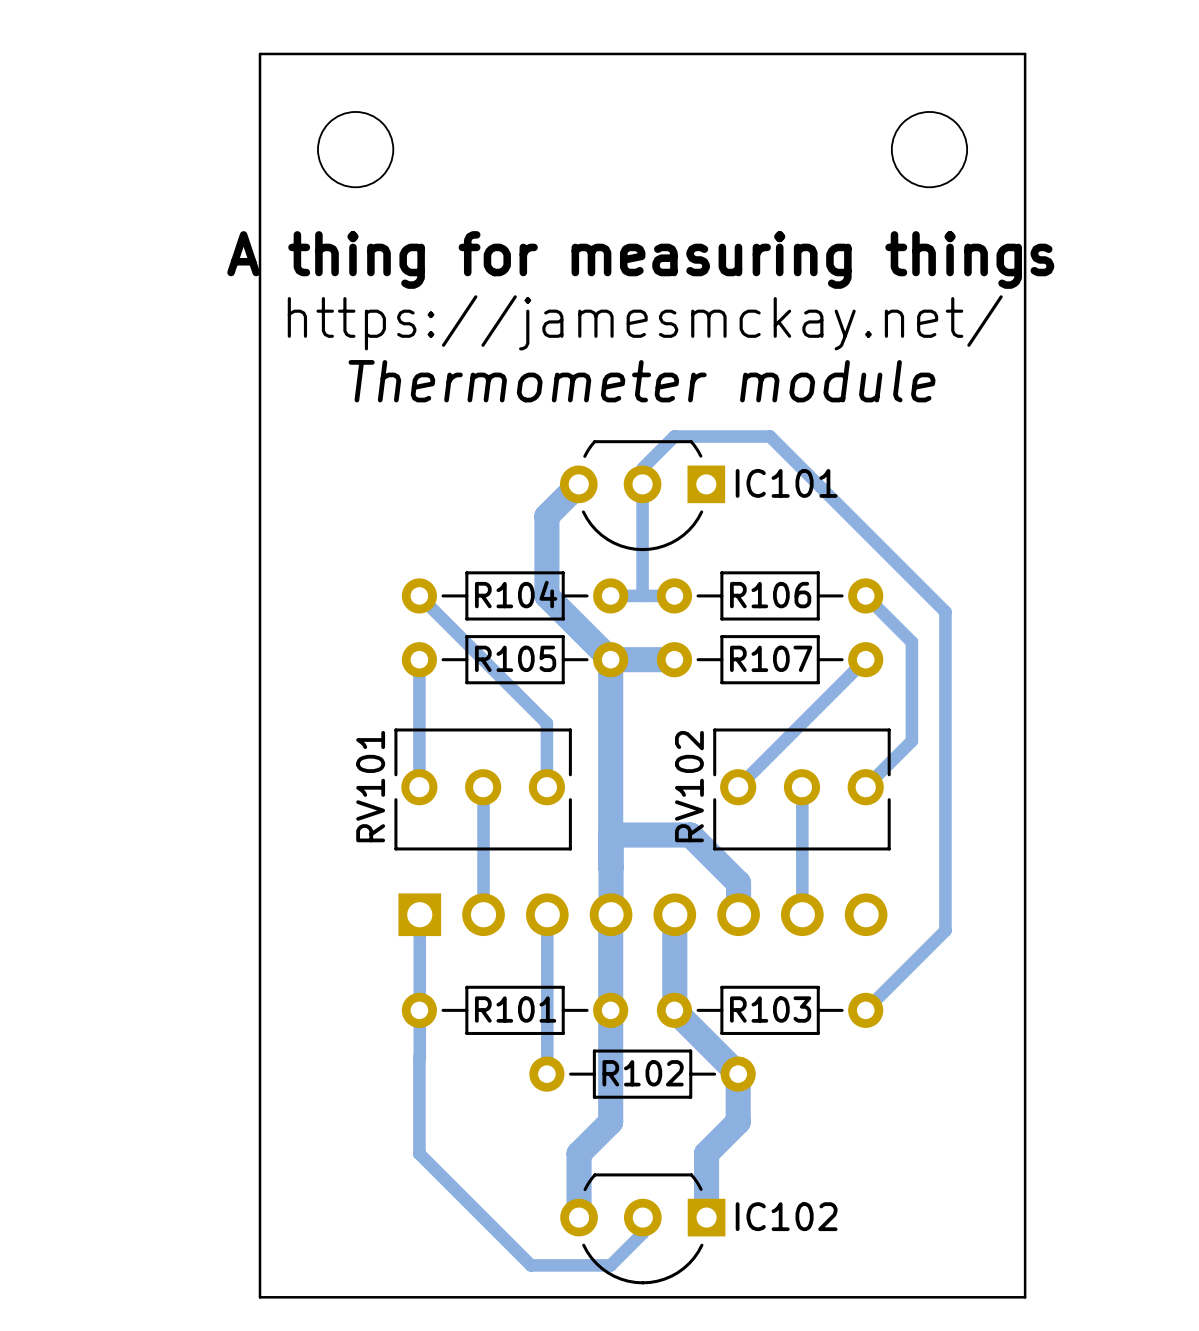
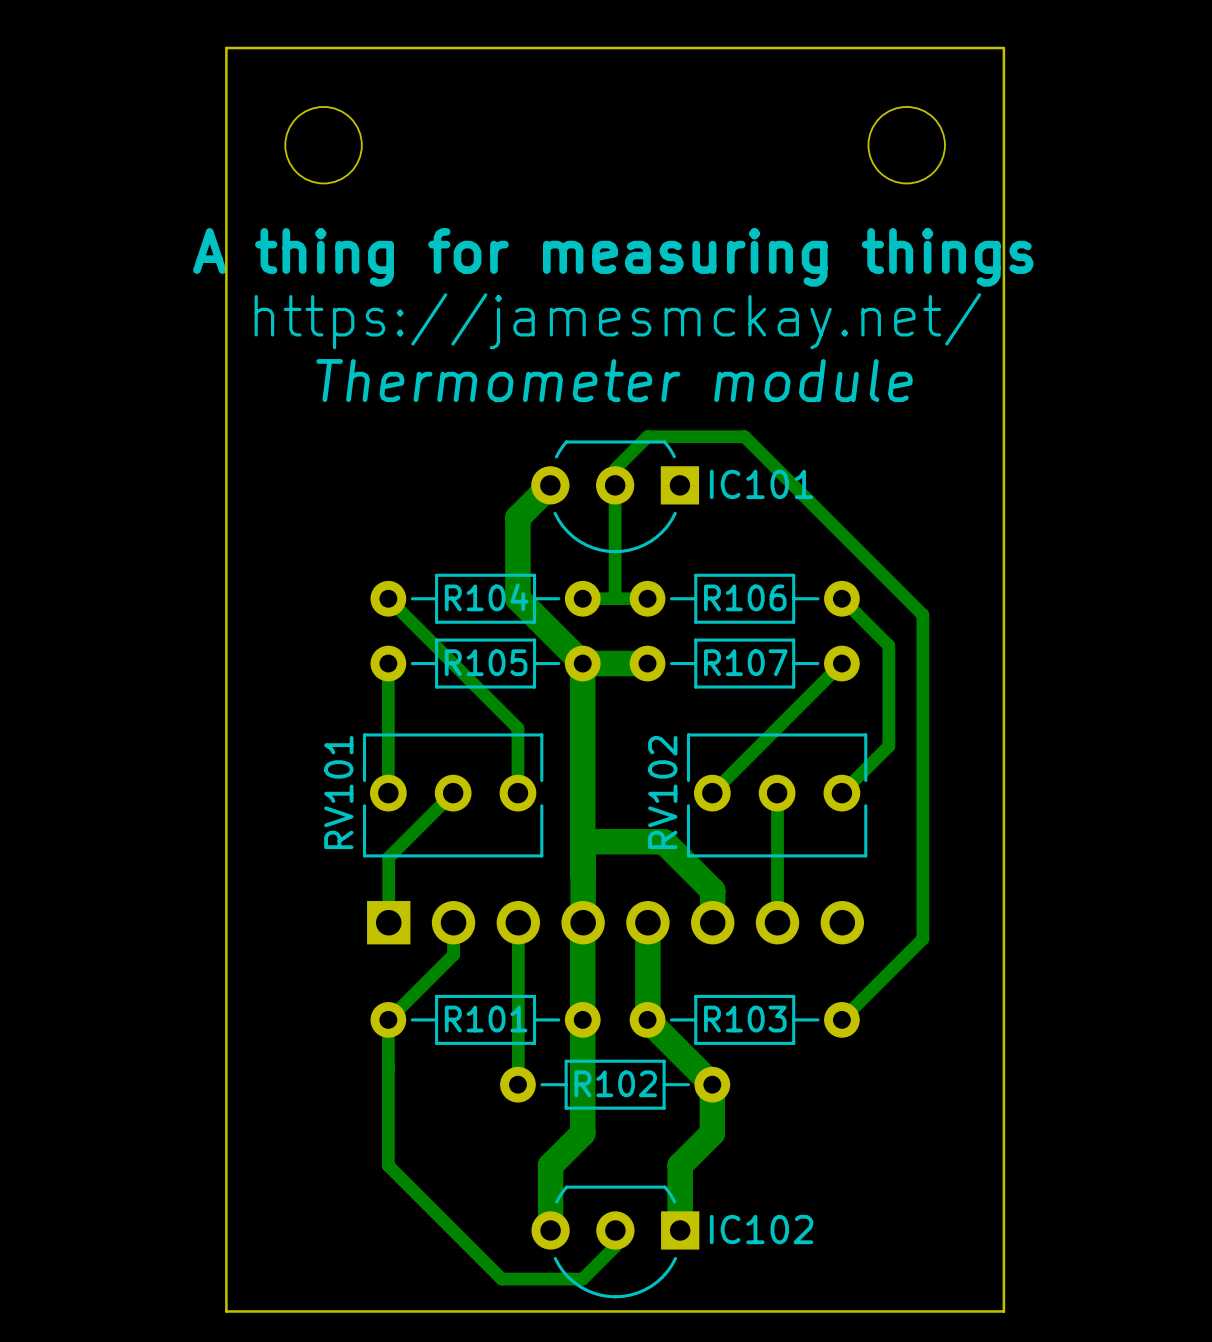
bottom track: (483, 787) (483, 914) -> (453, 793) (388, 857) (388, 922)
bottom track: (419, 914) (419, 1057) -> (453, 922) (453, 954) (388, 1019) (388, 1068)

